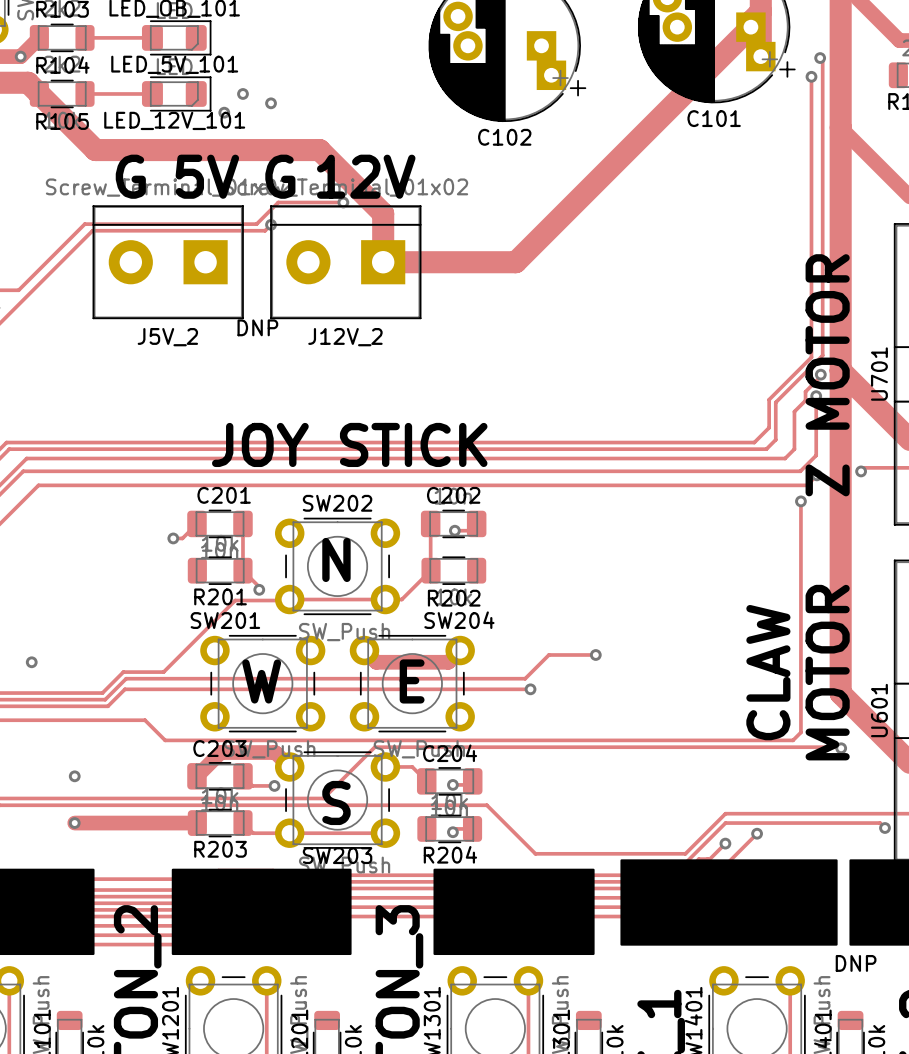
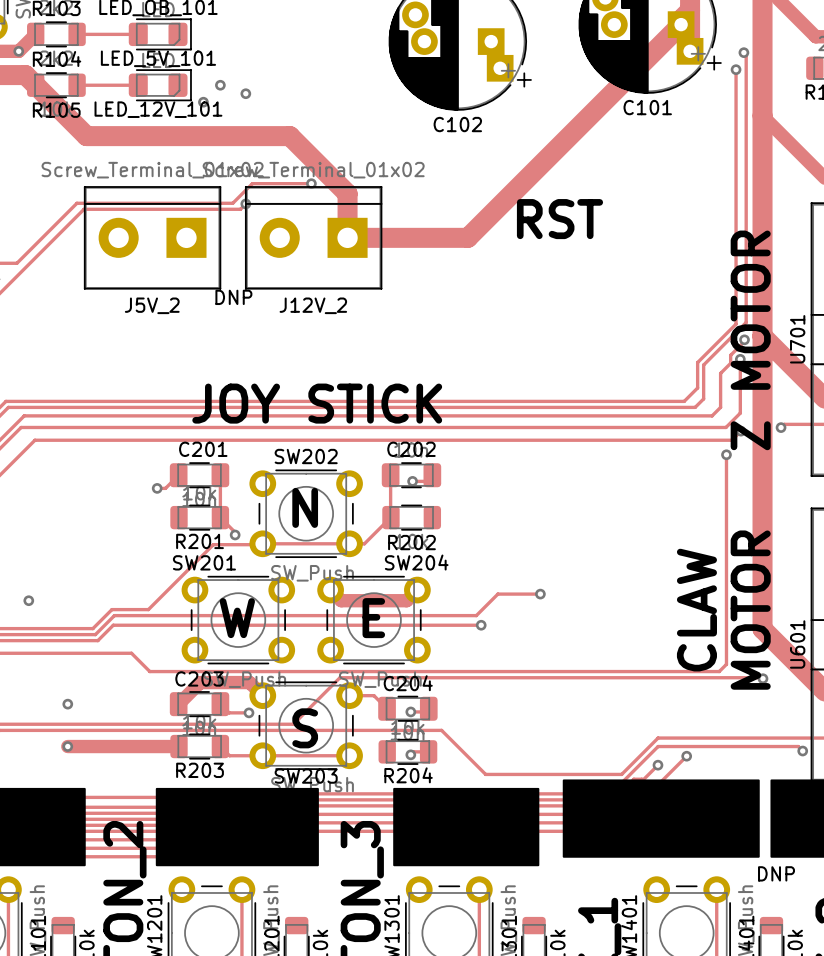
text: G (130, 176) -> none
text: 5V (207, 176) -> none
text: G (280, 176) -> none
text: 12V (366, 176) -> none
text: none -> RST (559, 219)

